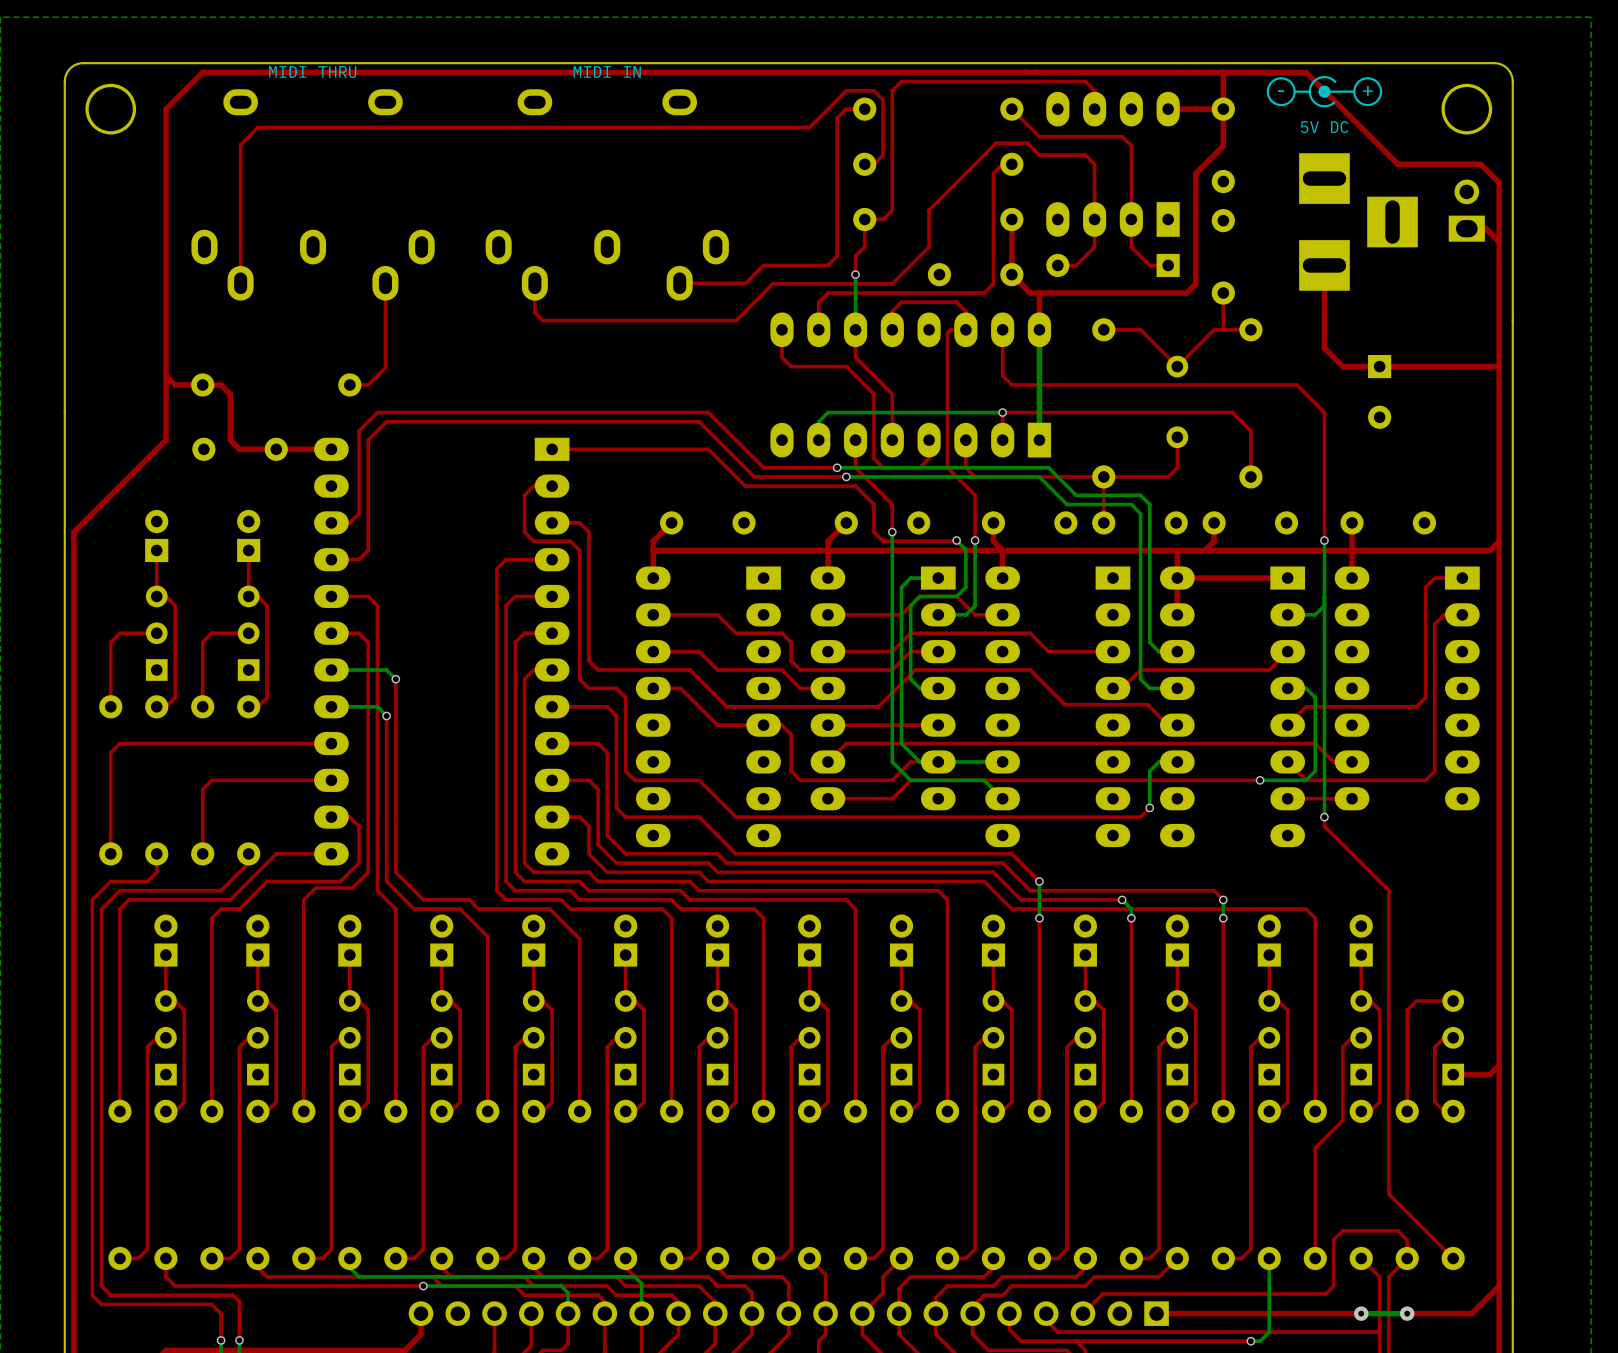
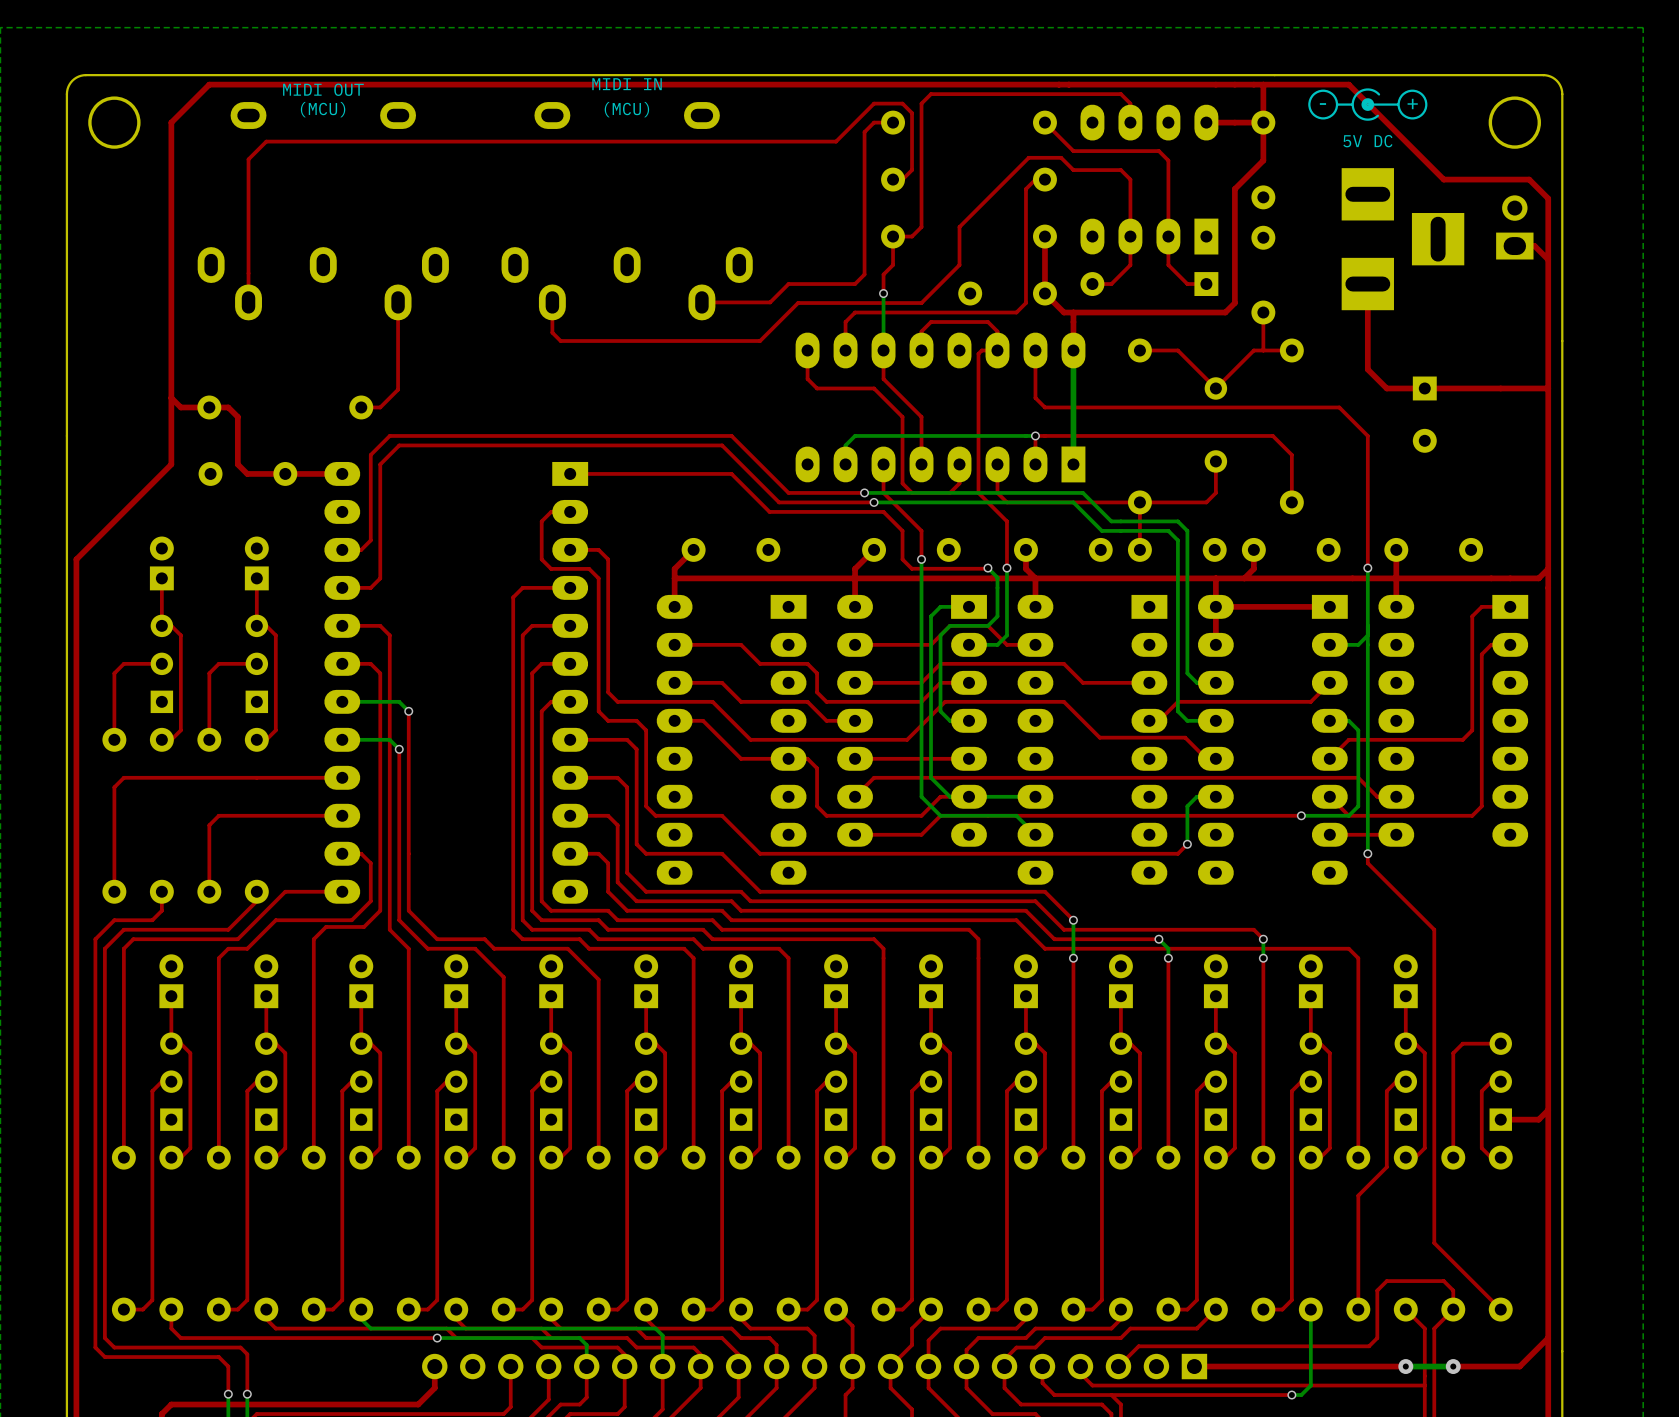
text: MIDI THRU (312, 72) -> MIDI OUT (323, 89)
text: none -> (MCU) (323, 109)
text: none -> (MCU) (626, 109)

